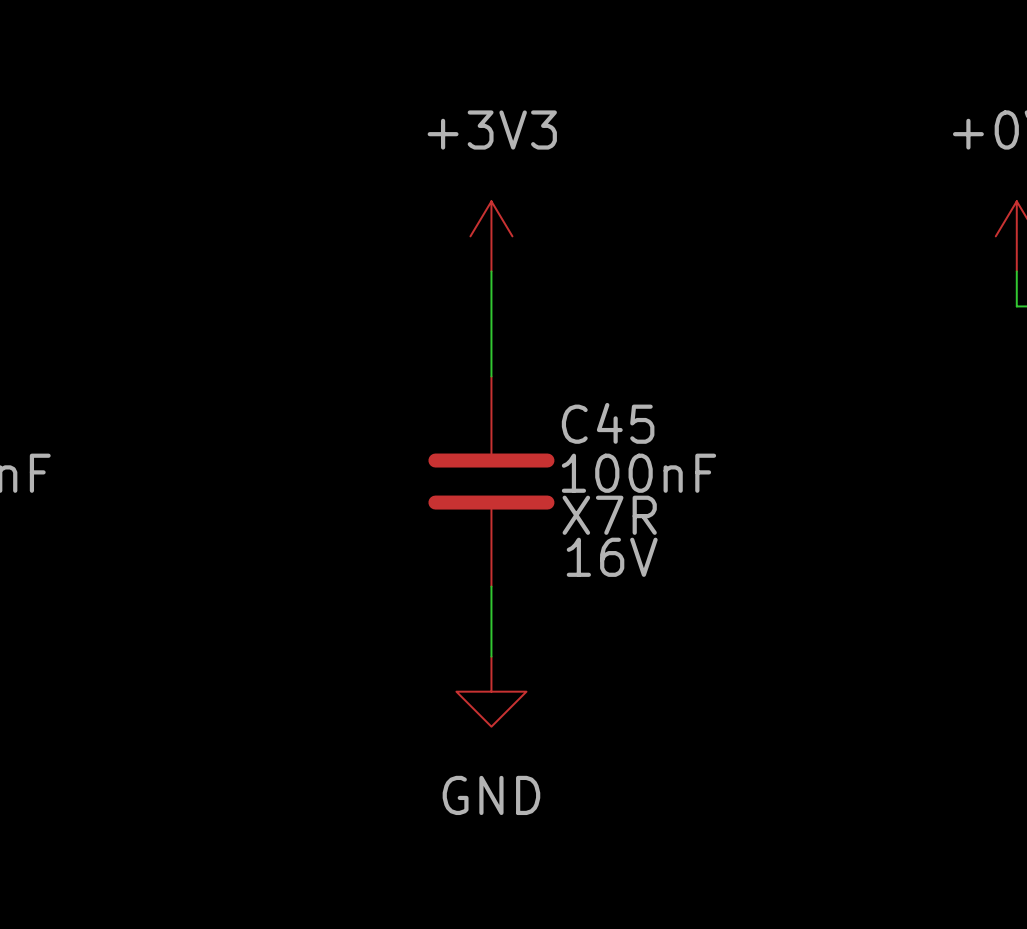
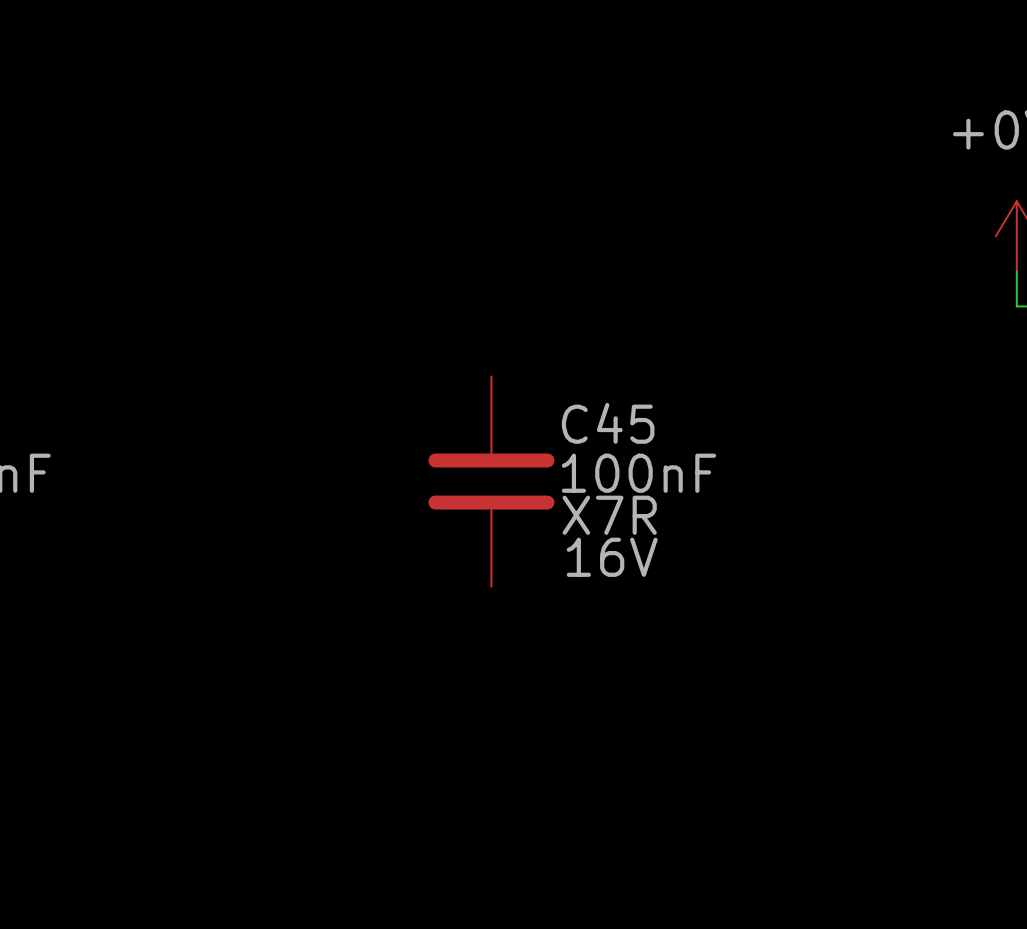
power symbol: +3V3 (491, 236) -> none
wire: (491, 271) (491, 376) -> none
wire: (491, 586) (491, 656) -> none
power symbol: GND (491, 691) -> none

